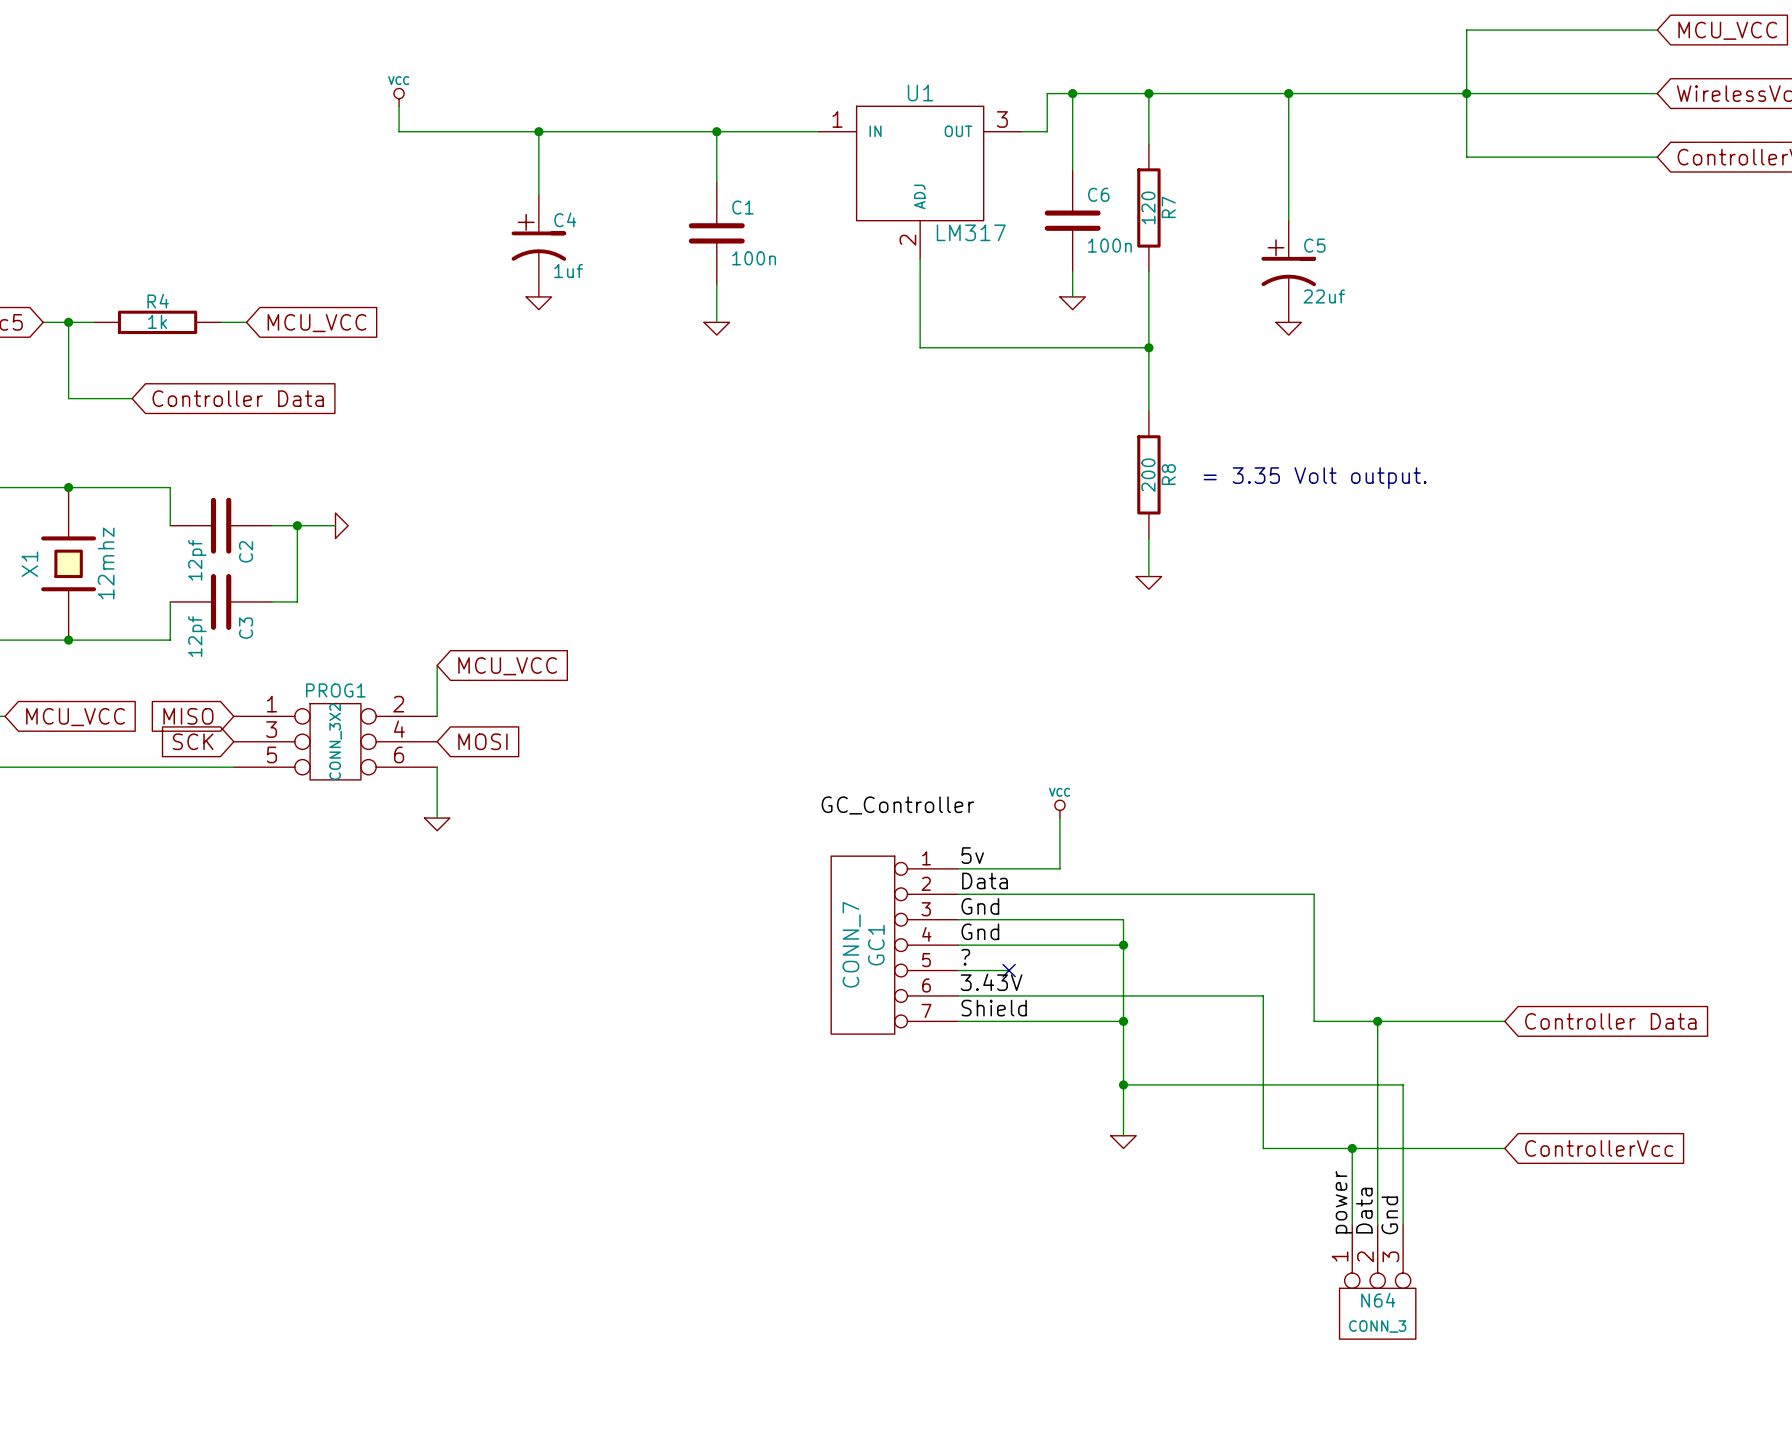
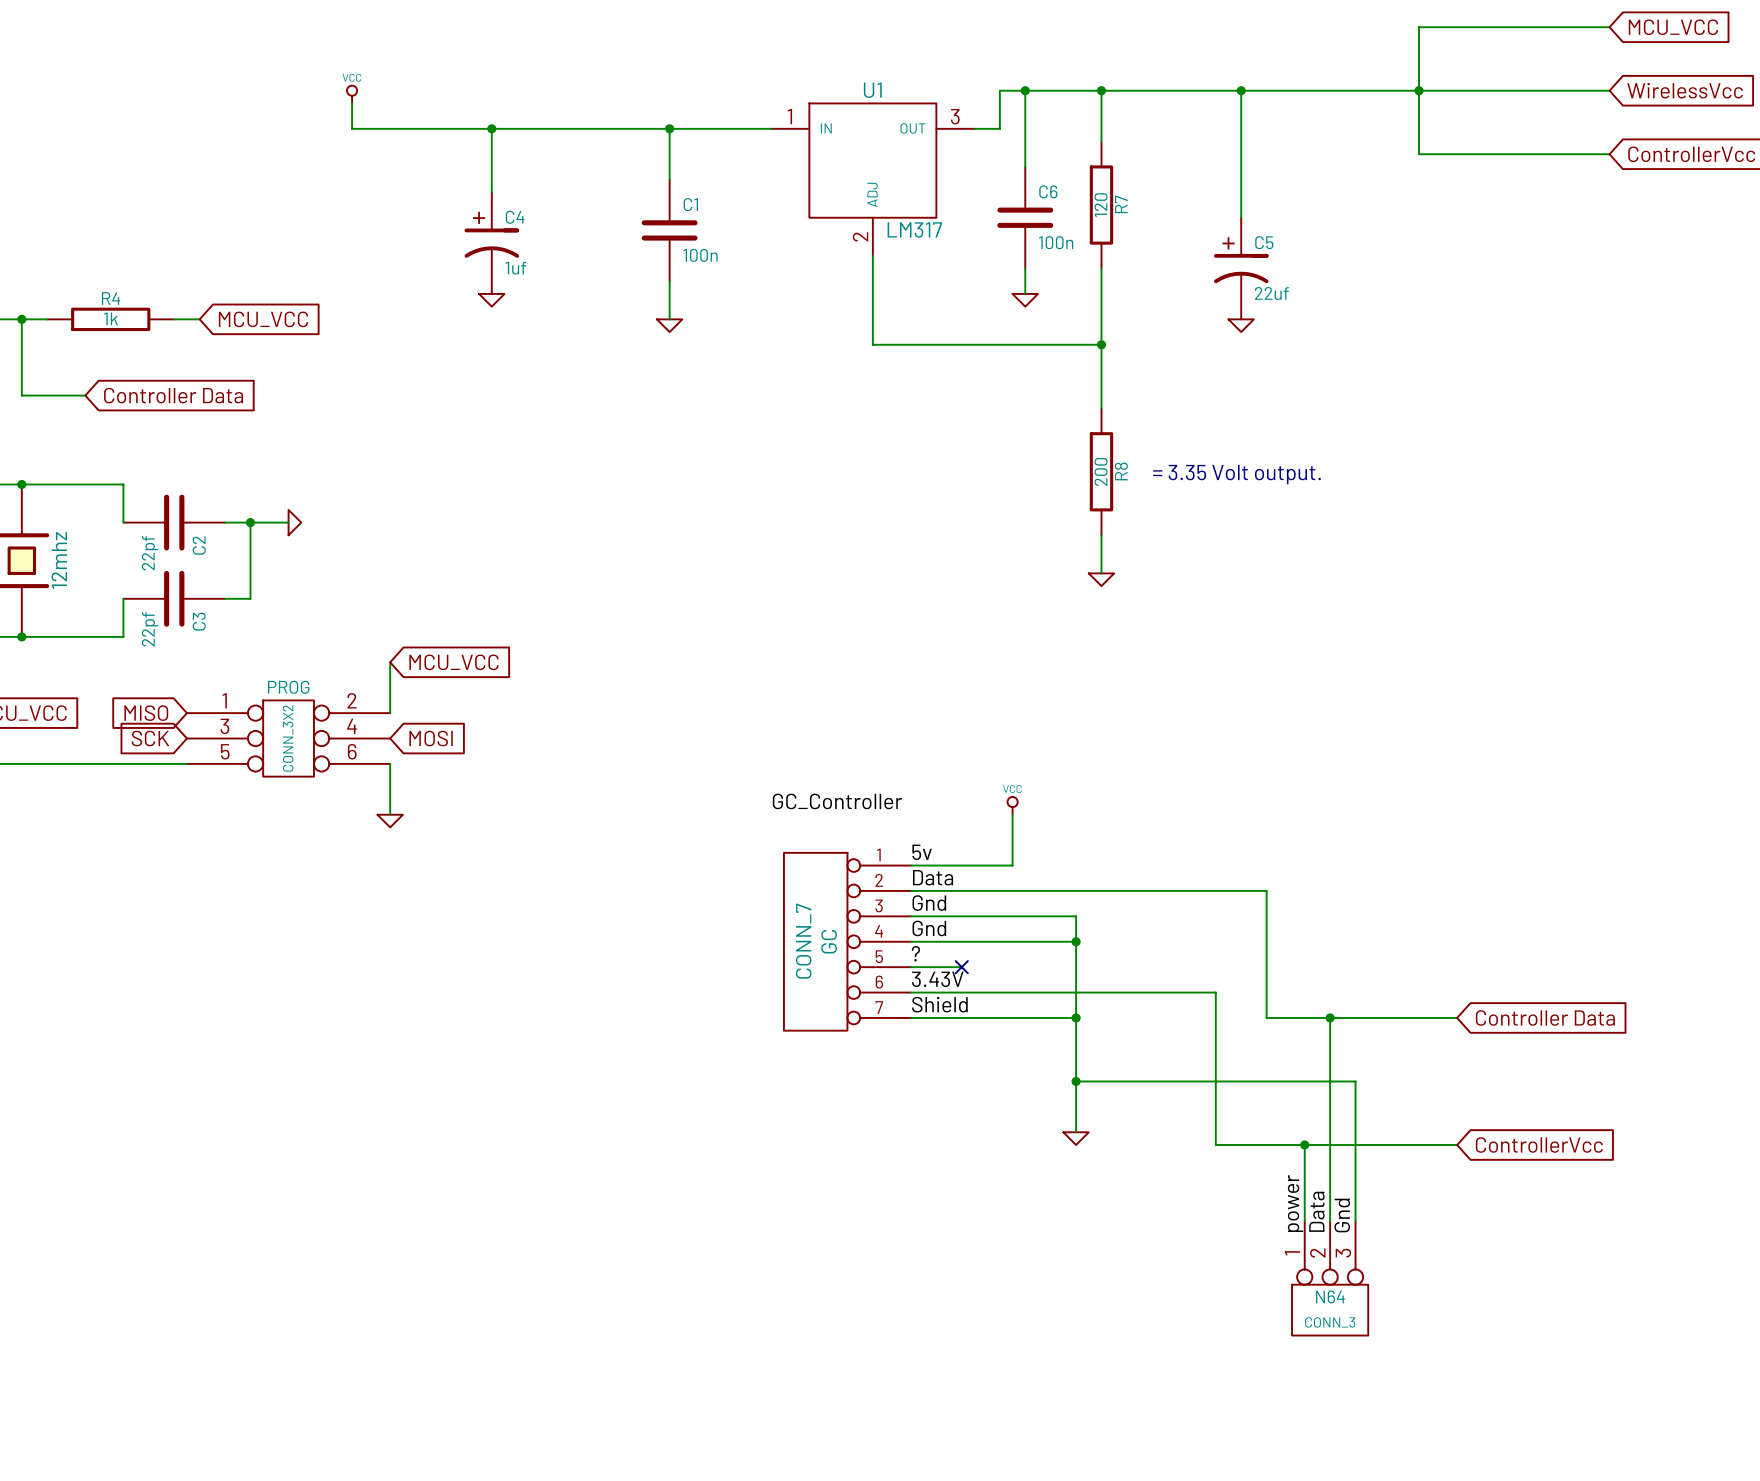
C2 value: 12pf (197, 560) -> 22pf (150, 553)
C3 value: 12pf (197, 636) -> 22pf (150, 629)
PROG1 name: PROG1 (335, 690) -> PROG (288, 687)
GC1 name: GC1 (876, 945) -> GC (829, 941)

